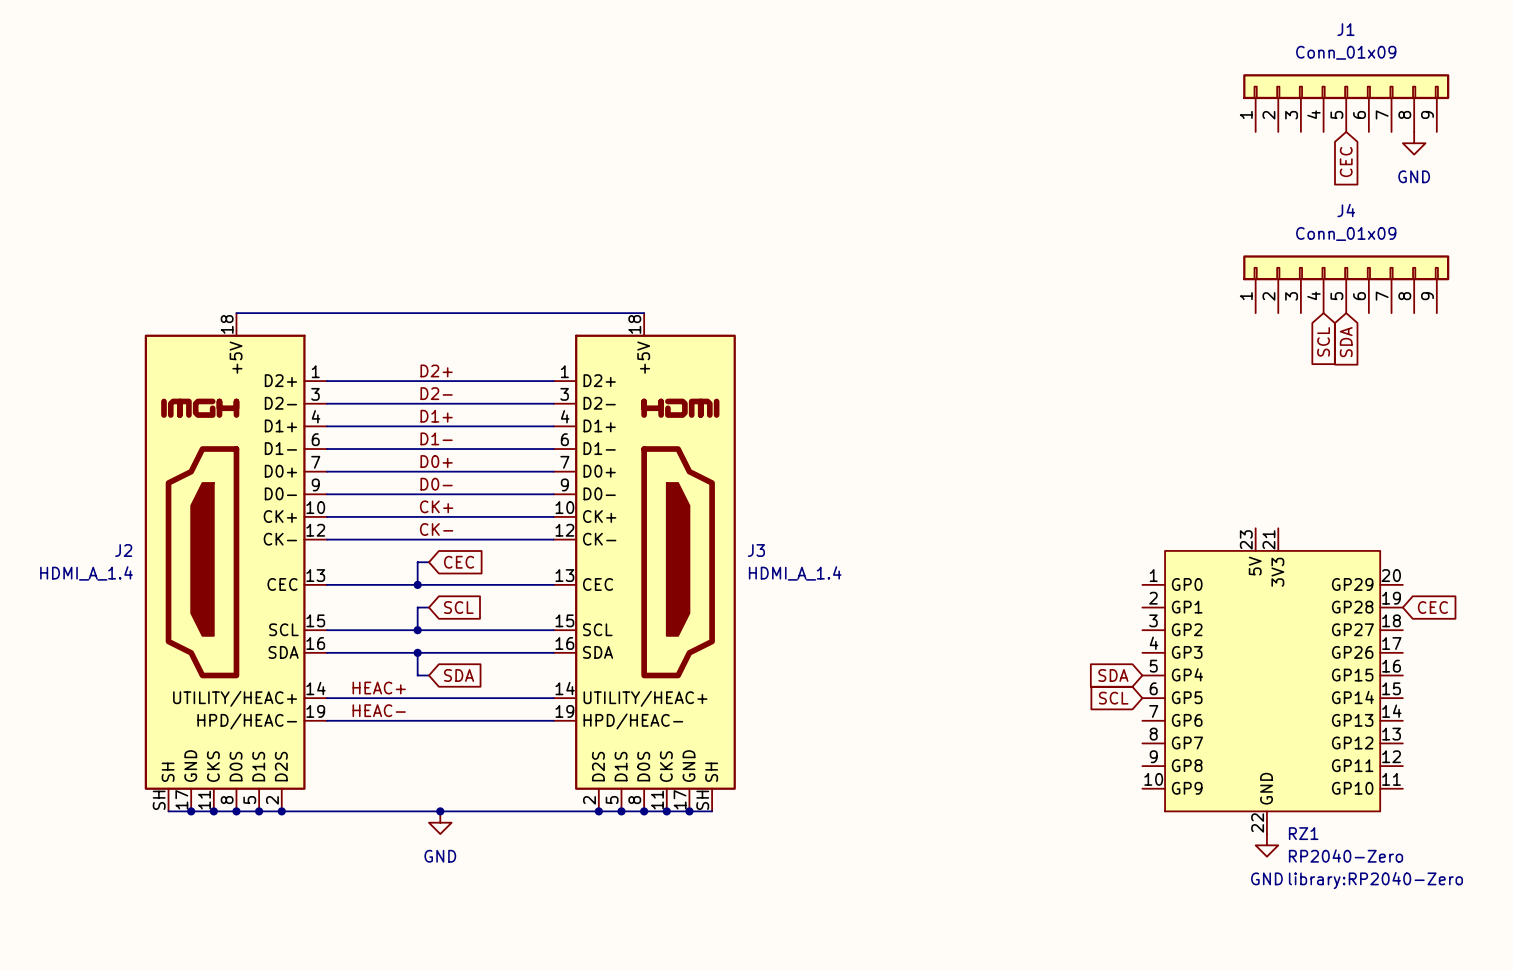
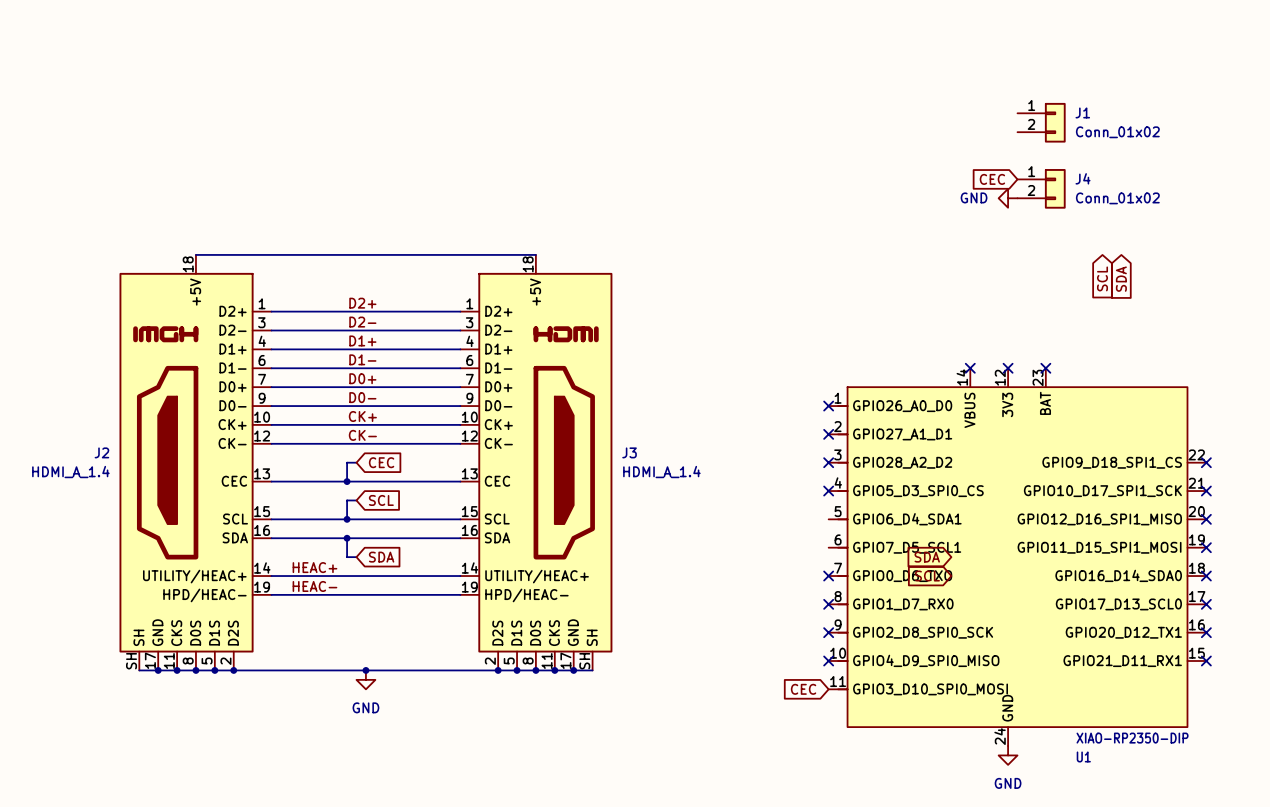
J1 name position: J1 (1345, 29) -> J1 (1082, 112)
J1 value: Conn_01x09 (1346, 52) -> Conn_01x02 (1117, 132)
J1 symbol: [1243, 74, 1450, 132] -> [1017, 102, 1066, 143]
power symbol: GND (1414, 143) -> none
global label rotation: 0° (1346, 162) -> 90° clockwise (992, 179)
global label position: CEC (1346, 162) -> CEC (992, 179)
J4 name position: J4 (1346, 210) -> J4 (1083, 178)
J4 value: Conn_01x09 (1346, 233) -> Conn_01x02 (1117, 198)
power symbol: none -> GND (1008, 198)
J4 symbol: [1243, 255, 1450, 314] -> [1017, 169, 1066, 209]
no-connect mark: none -> (970, 368)
no-connect mark: none -> (1008, 368)
no-connect mark: none -> (1045, 368)
no-connect mark: none -> (828, 406)
no-connect mark: none -> (828, 434)
no-connect mark: none -> (828, 462)
no-connect mark: none -> (1206, 462)
no-connect mark: none -> (828, 491)
no-connect mark: none -> (1206, 491)
global label: CEC (1432, 607) -> none
no-connect mark: none -> (1206, 519)
no-connect mark: none -> (1206, 547)
U1: none -> XIAO-RP2350-DIP (1017, 557)
RZ1: RP2040-Zero (1272, 681) -> none
no-connect mark: none -> (828, 576)
no-connect mark: none -> (1206, 576)
no-connect mark: none -> (828, 604)
no-connect mark: none -> (1206, 604)
no-connect mark: none -> (828, 632)
no-connect mark: none -> (1206, 632)
no-connect mark: none -> (828, 661)
no-connect mark: none -> (1206, 661)
global label: none -> CEC (803, 689)
power symbol position: GND (1266, 845) -> GND (1008, 755)

